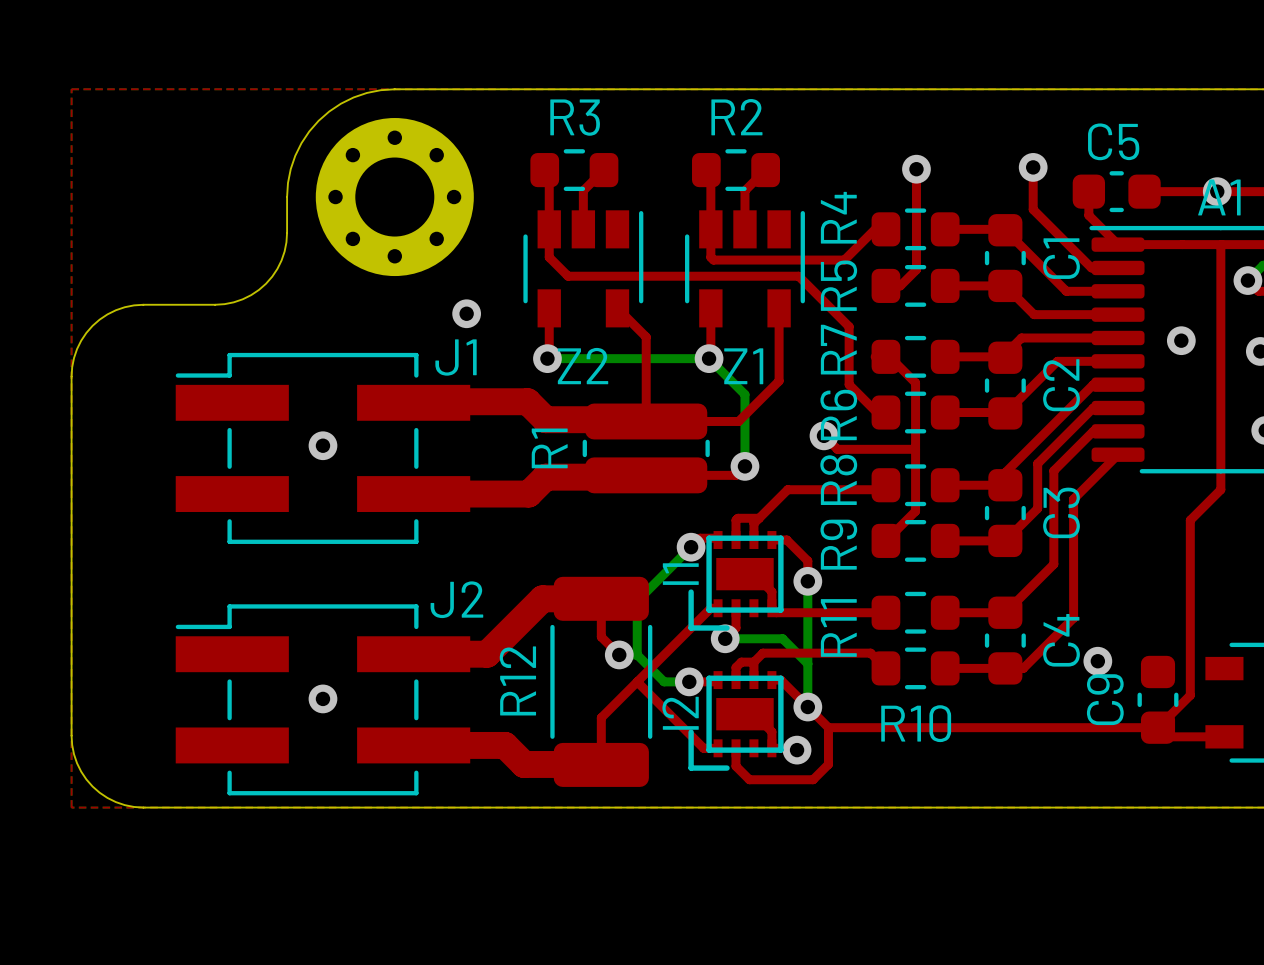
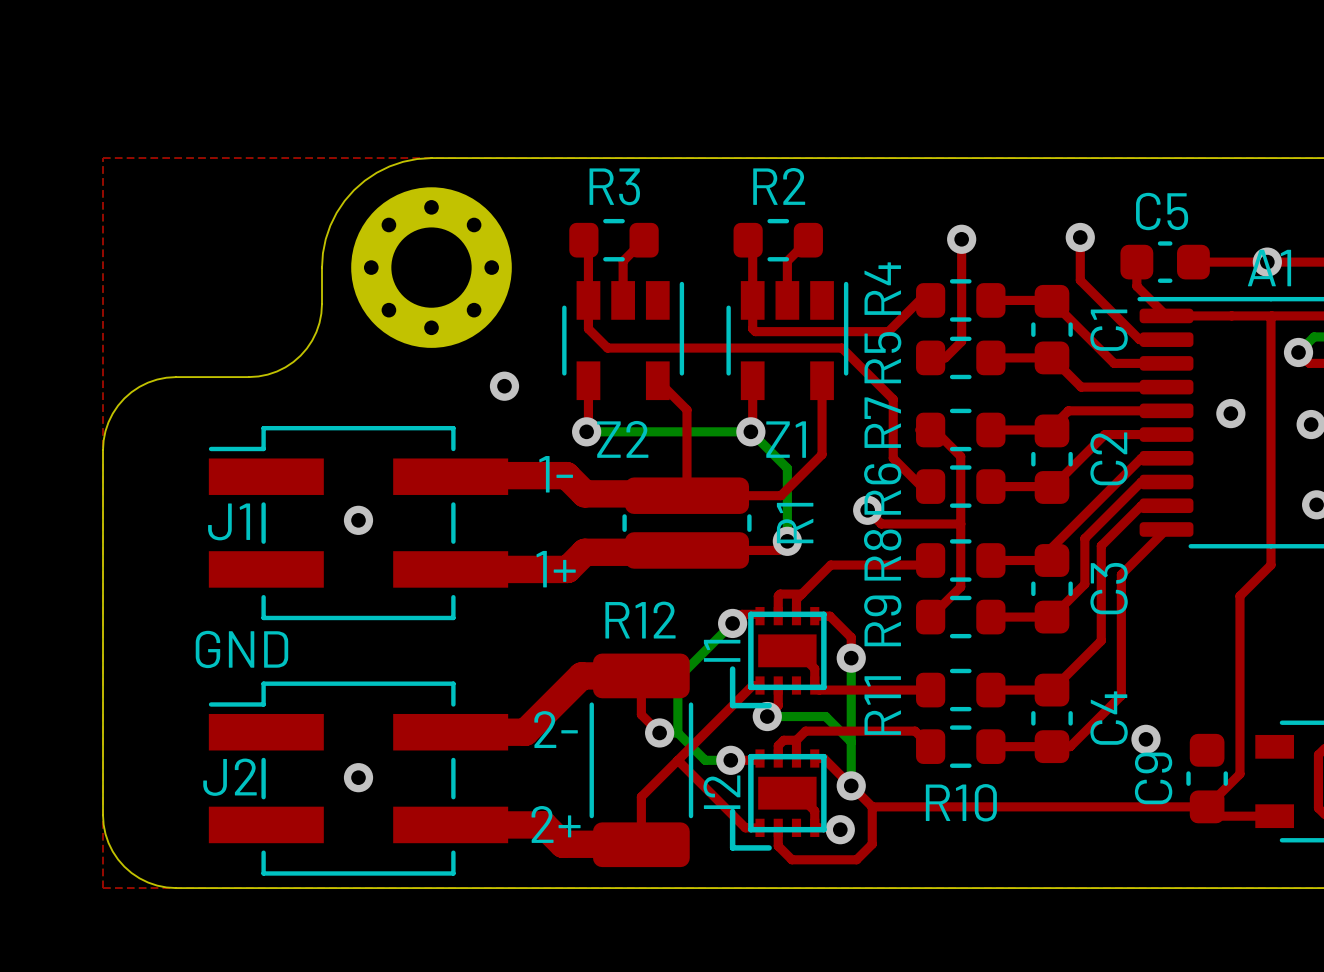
J1 name position: J1 (456, 357) -> J1 (229, 521)
text: none -> 1- (556, 474)
R1 name position: R1 (549, 448) -> R1 (795, 523)
text: none -> 1+ (556, 569)
text: none -> GND (241, 649)
J2 name position: J2 (456, 599) -> J2 (229, 777)
text: none -> 2- (556, 729)
R12 name rotation: 0° (517, 680) -> 90° clockwise (640, 620)
R12 name position: R12 (517, 680) -> R12 (640, 620)
text: none -> 2+ (556, 824)

